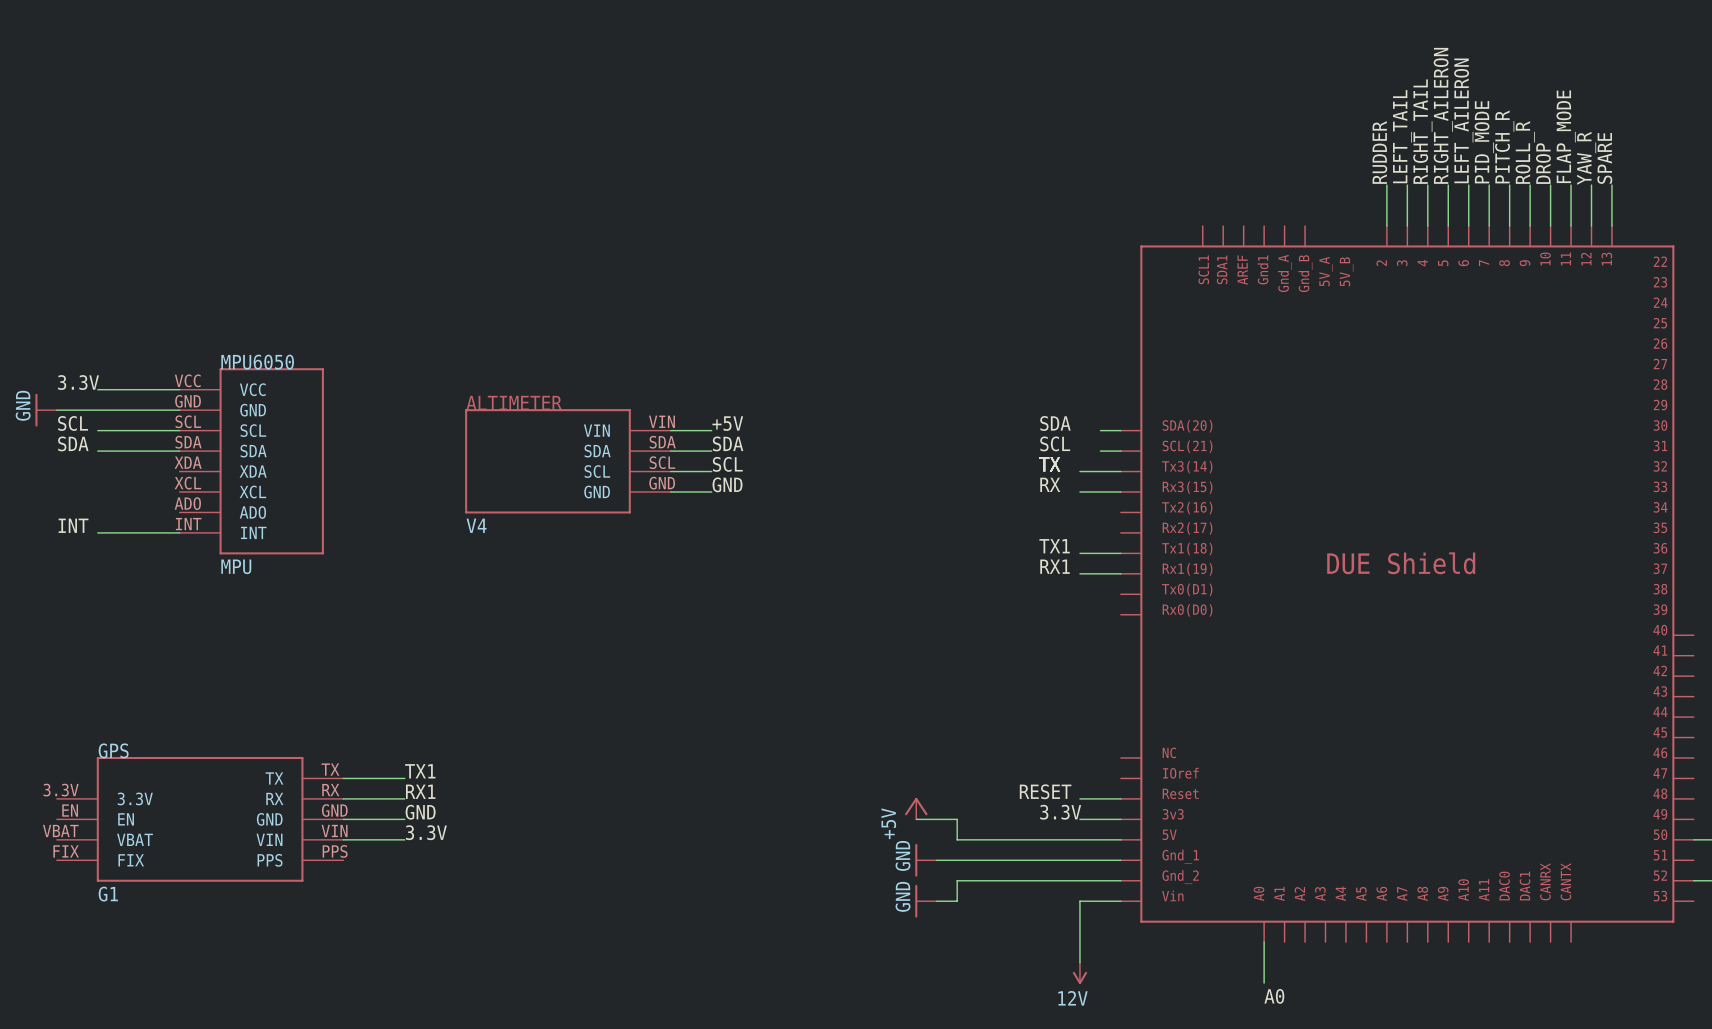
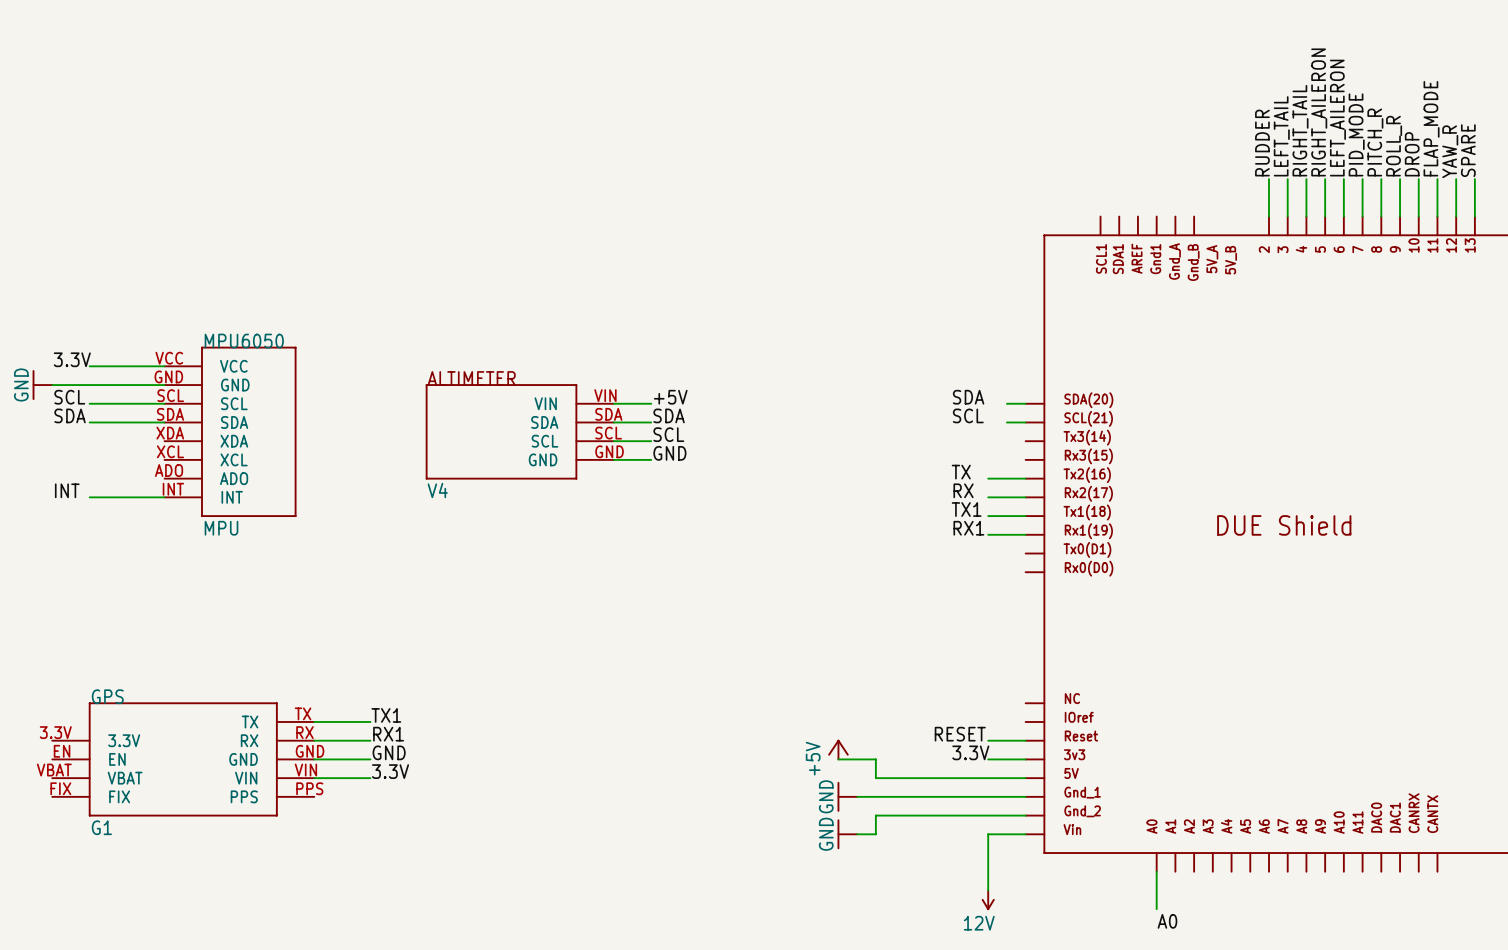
label position: TX (1049, 464) -> TX (961, 472)
wire: (1079, 471) (1120, 471) -> (988, 478) (1025, 478)
label position: RX (1050, 484) -> RX (963, 490)
wire: (1079, 492) (1120, 492) -> (988, 497) (1025, 497)

